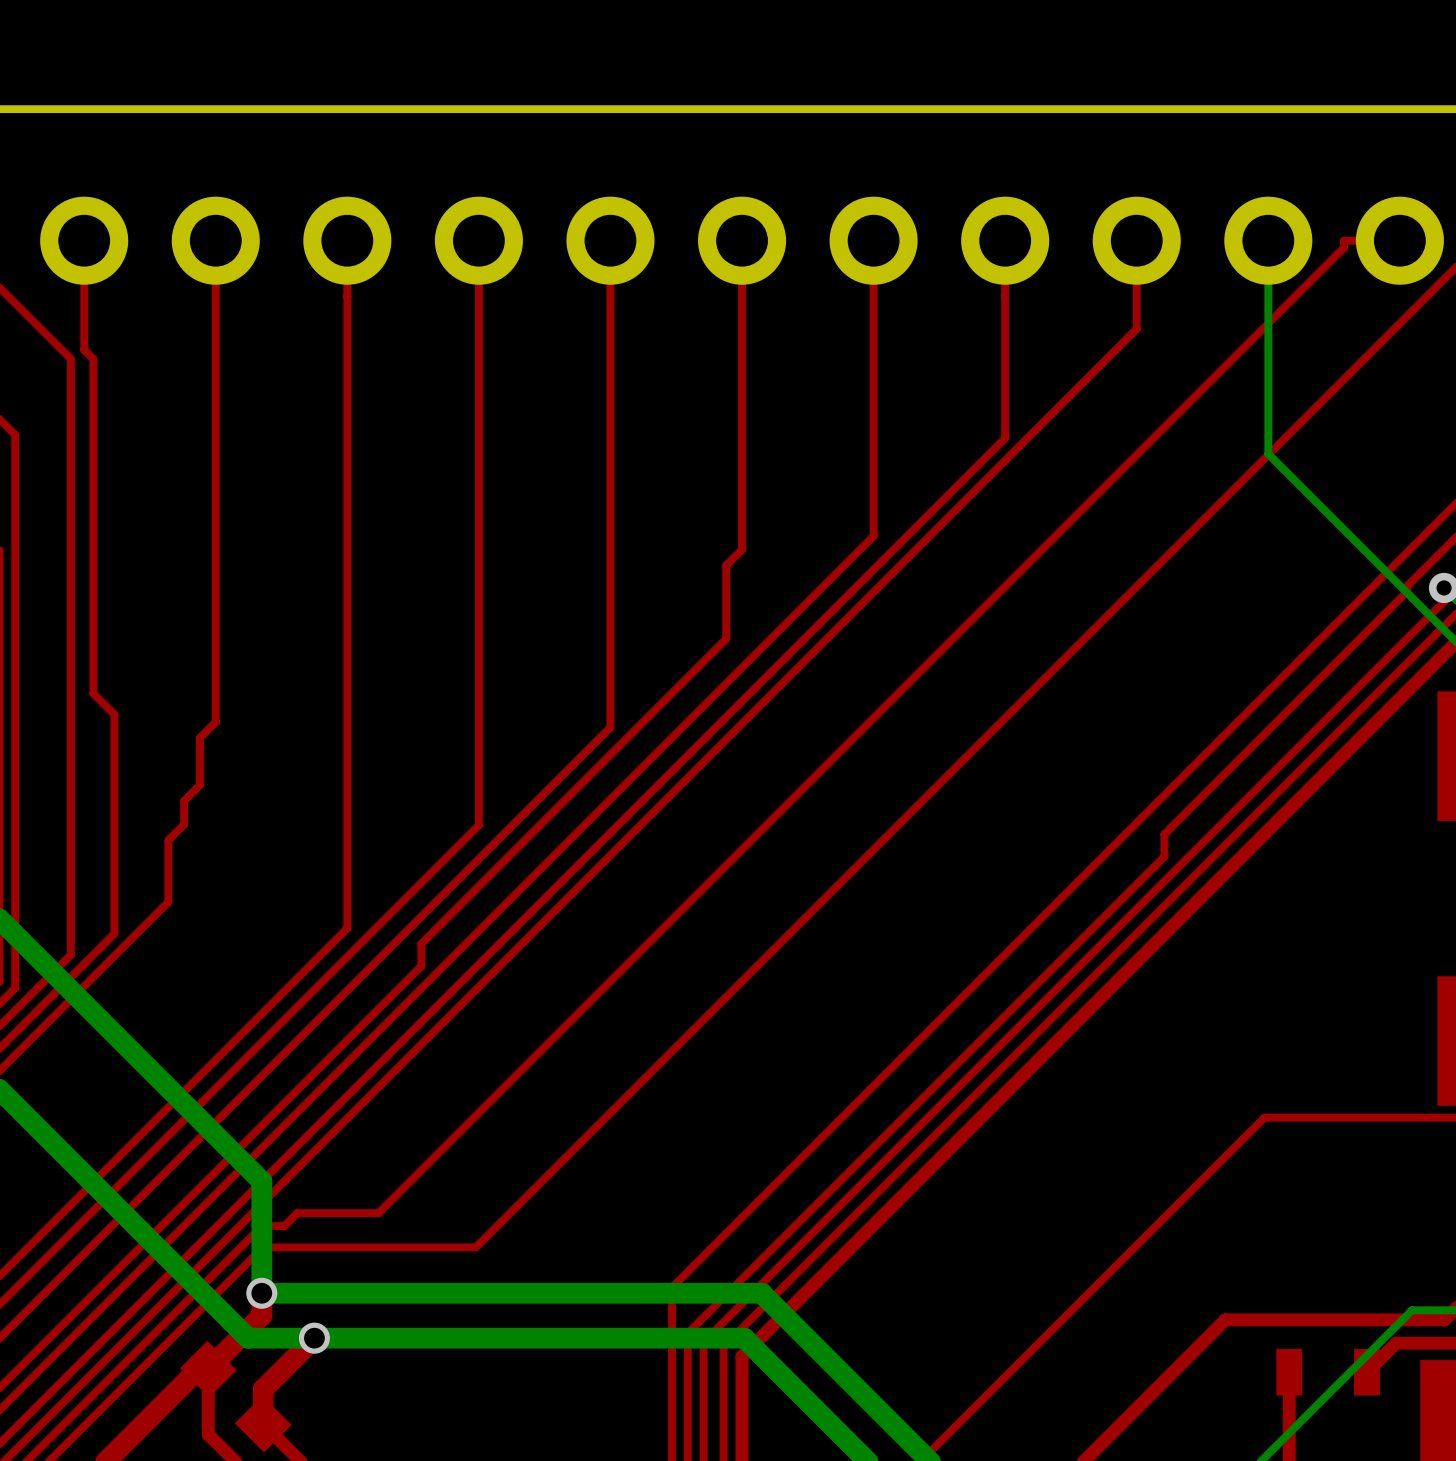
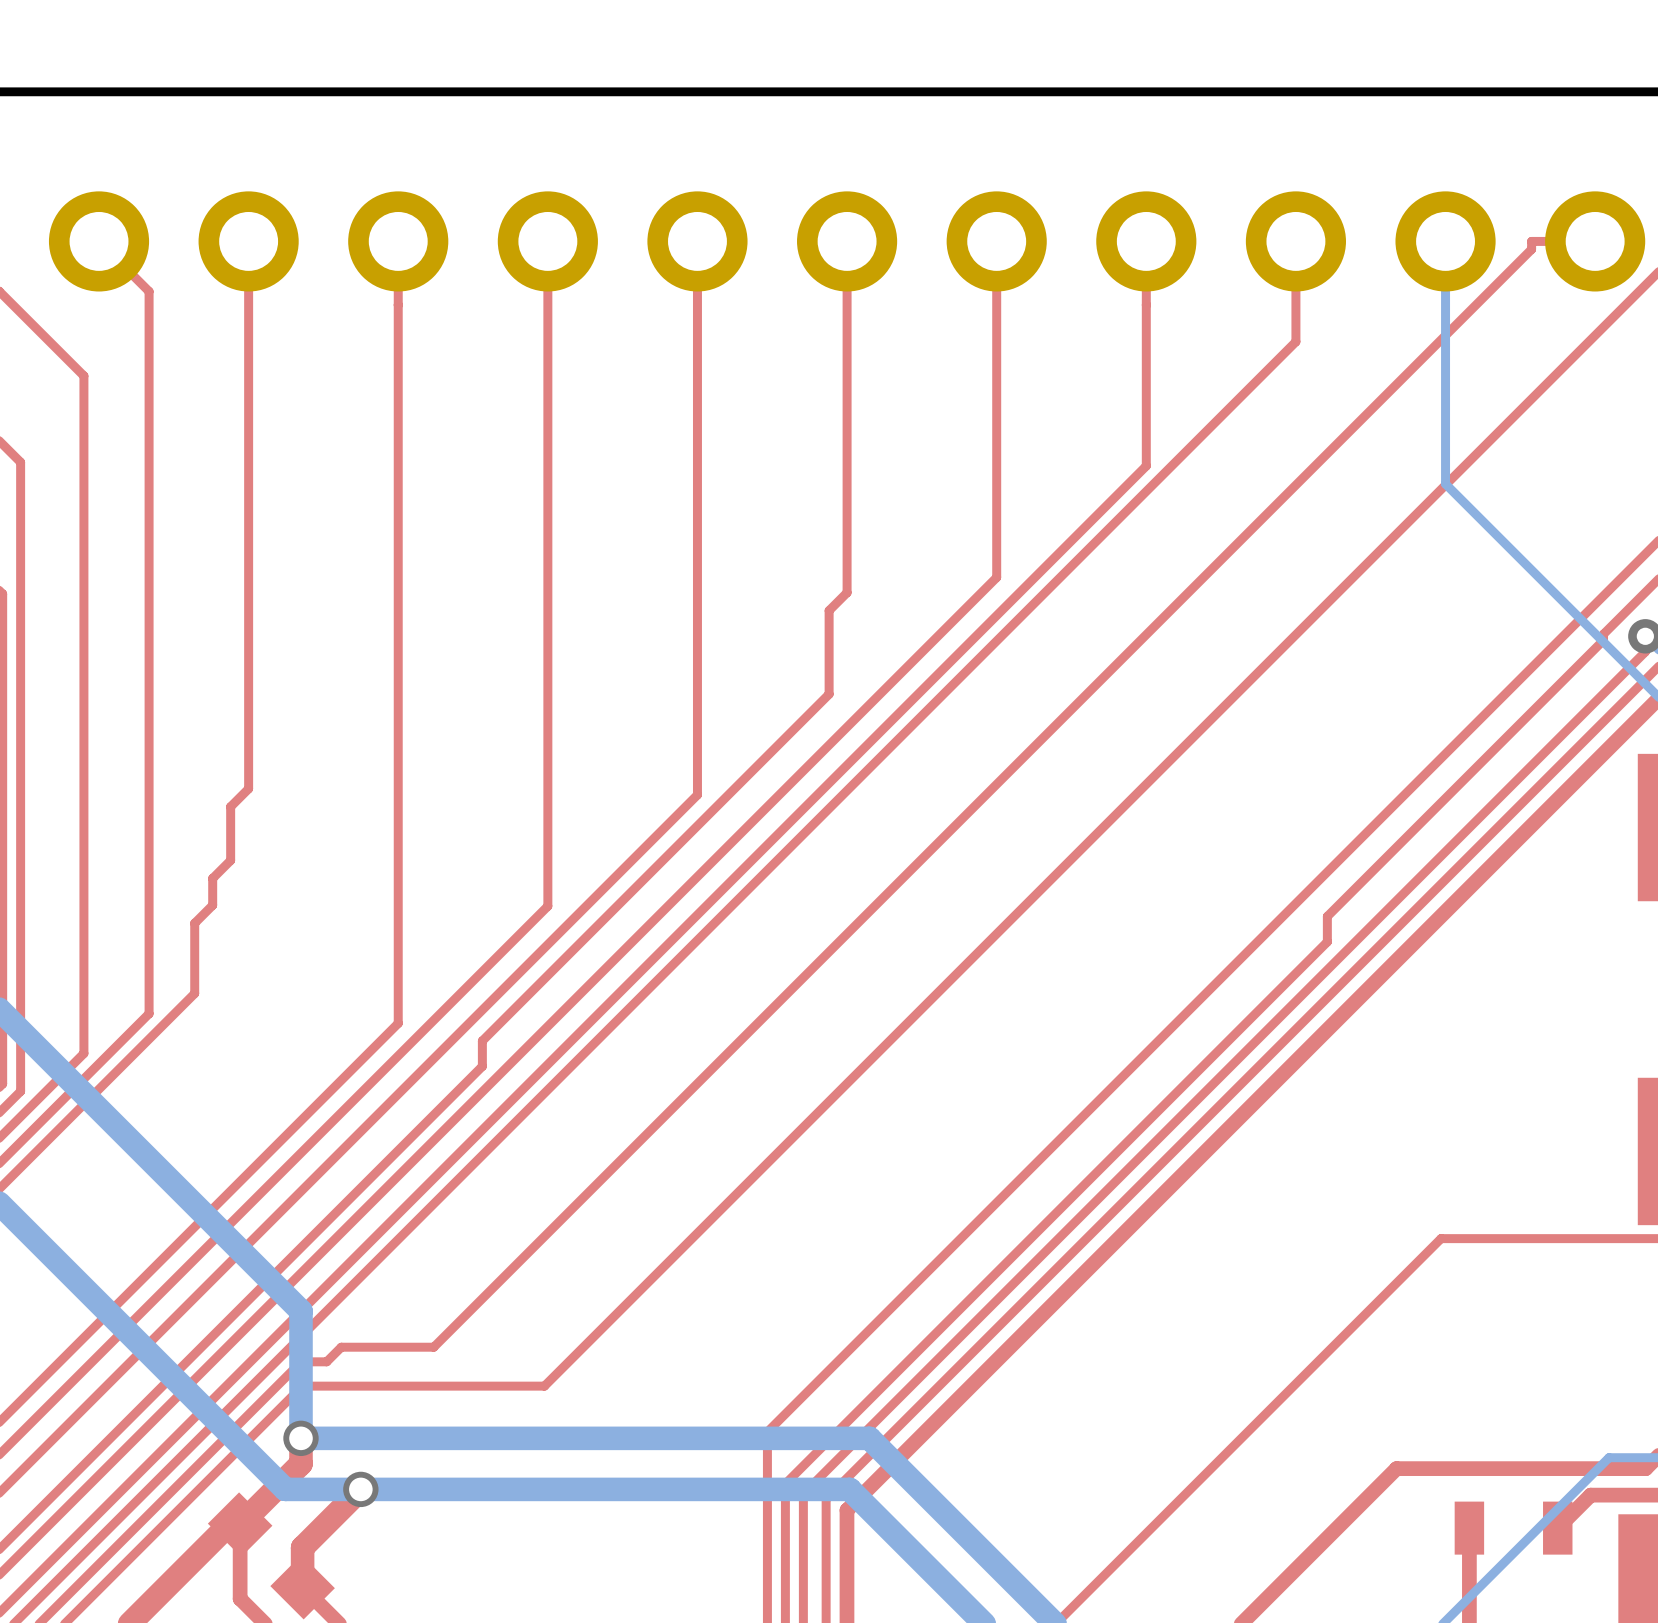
top track: (84, 240) (84, 349) (93, 359) (93, 693) (114, 714) (114, 933) -> (99, 241) (149, 291) (149, 1013) (133, 1029)

